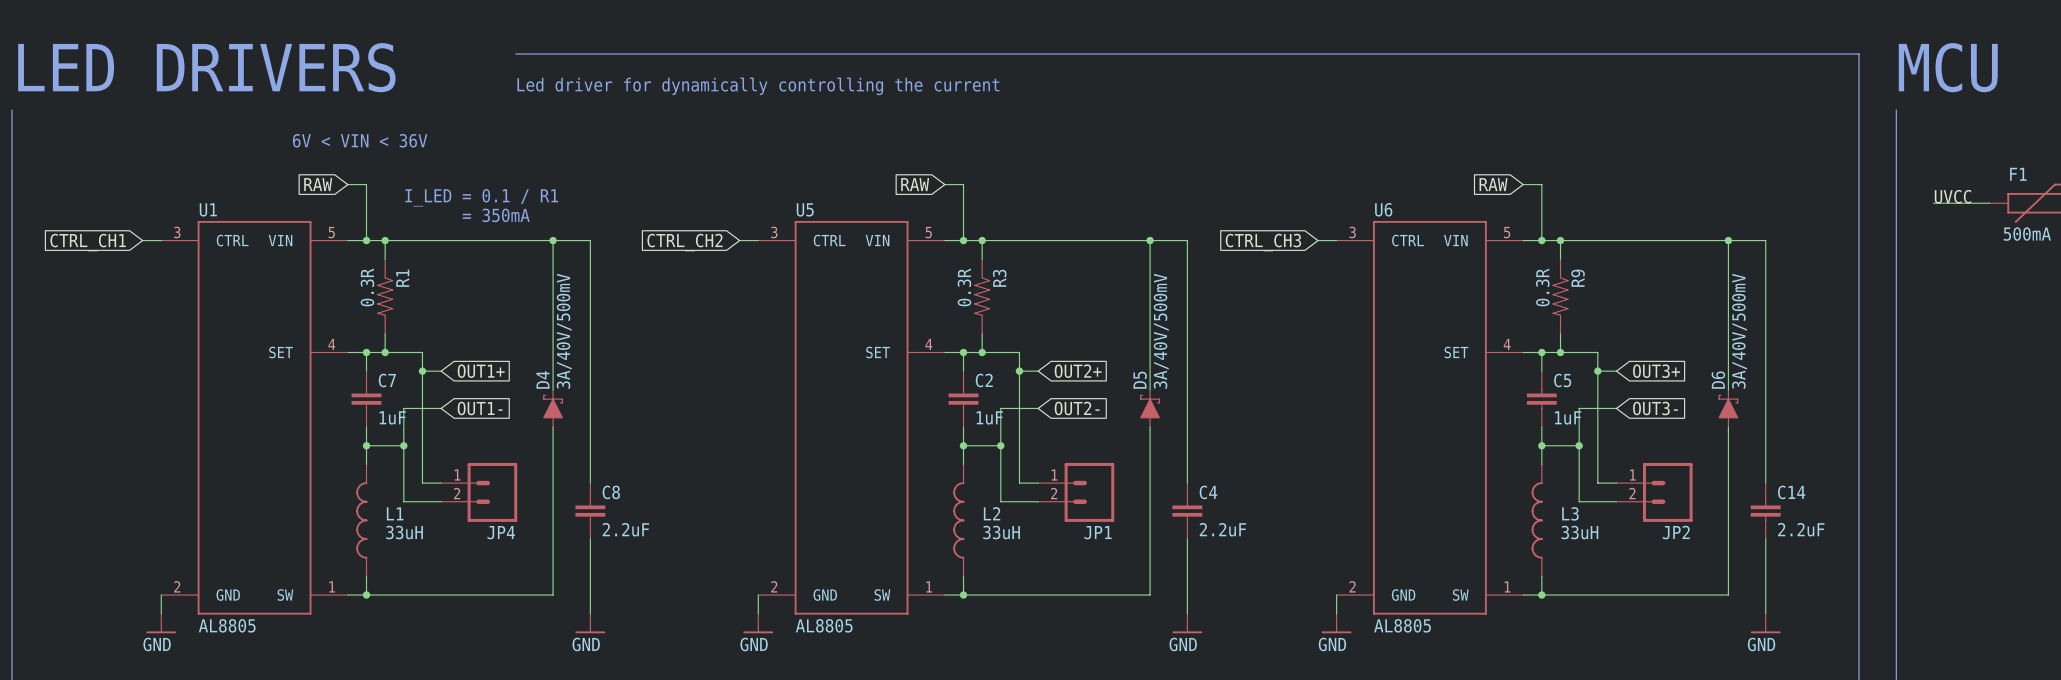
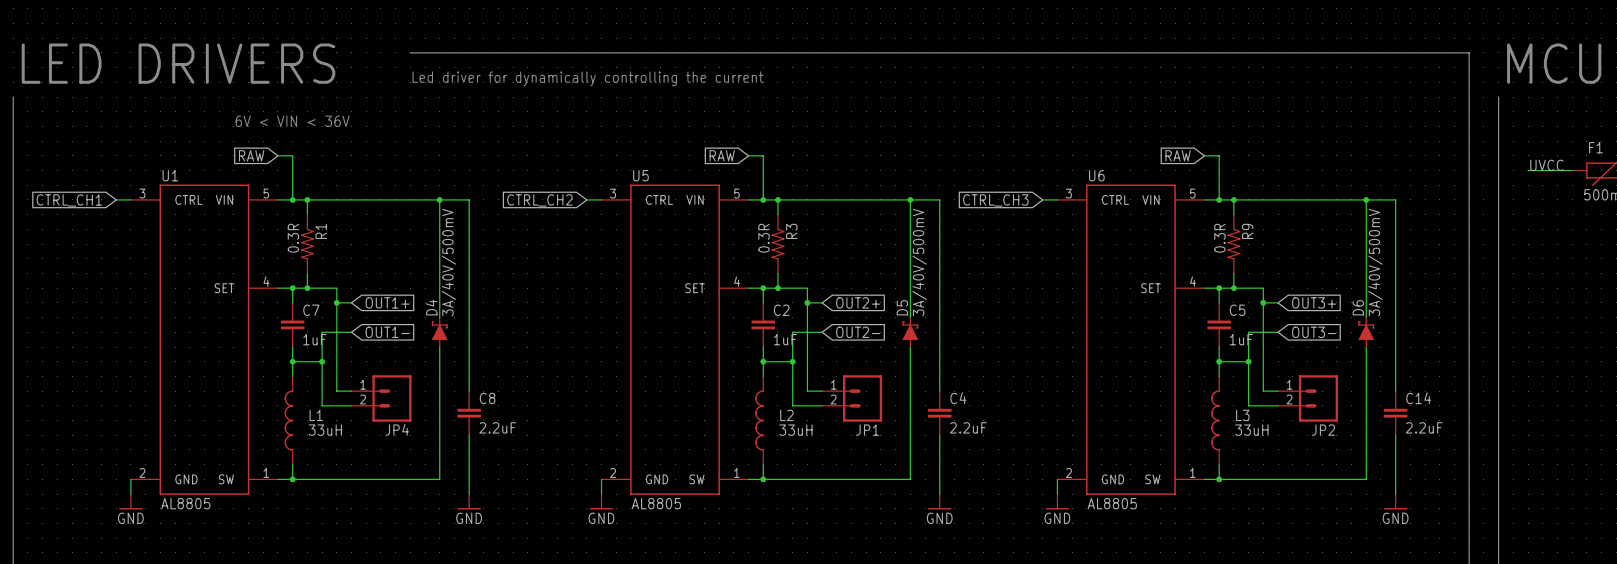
text: I_LED = 0.1 / R1 (481, 197) -> none
text: = 350mA (496, 215) -> none

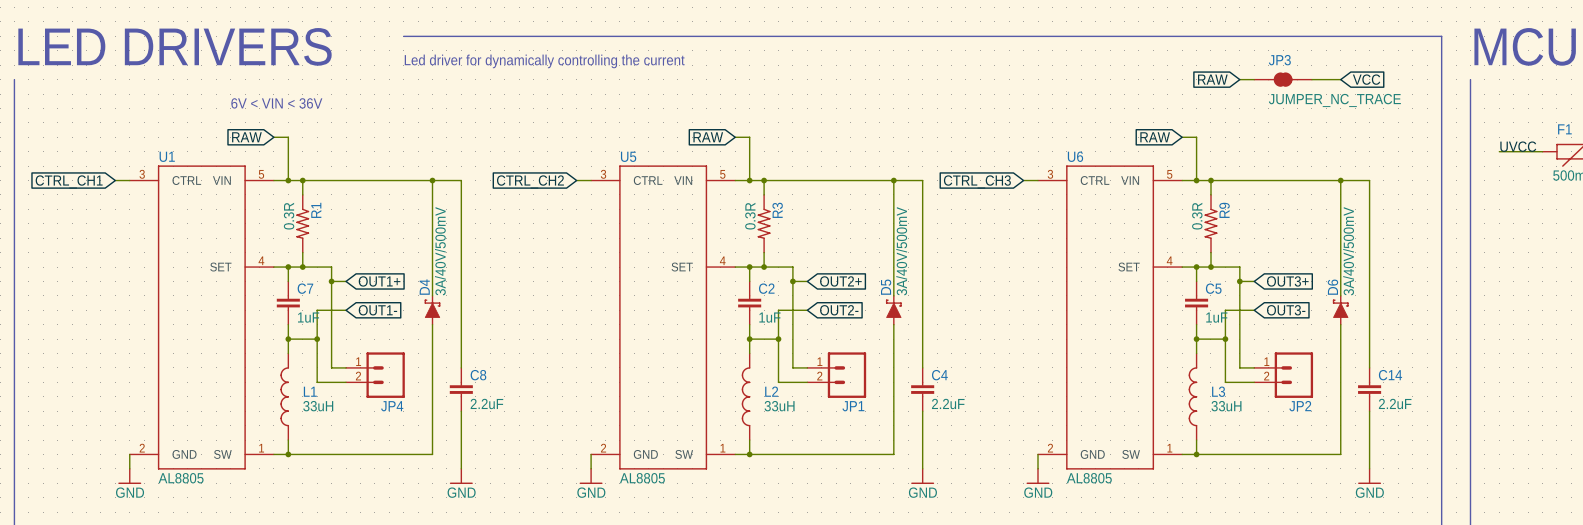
global label: none -> RAW (1212, 79)
wire: none -> (1239, 79) (1254, 79)
JP3: none -> JUMPER_NC_TRACE (1283, 79)
wire: none -> (1311, 79) (1340, 79)
global label: none -> VCC (1366, 79)

